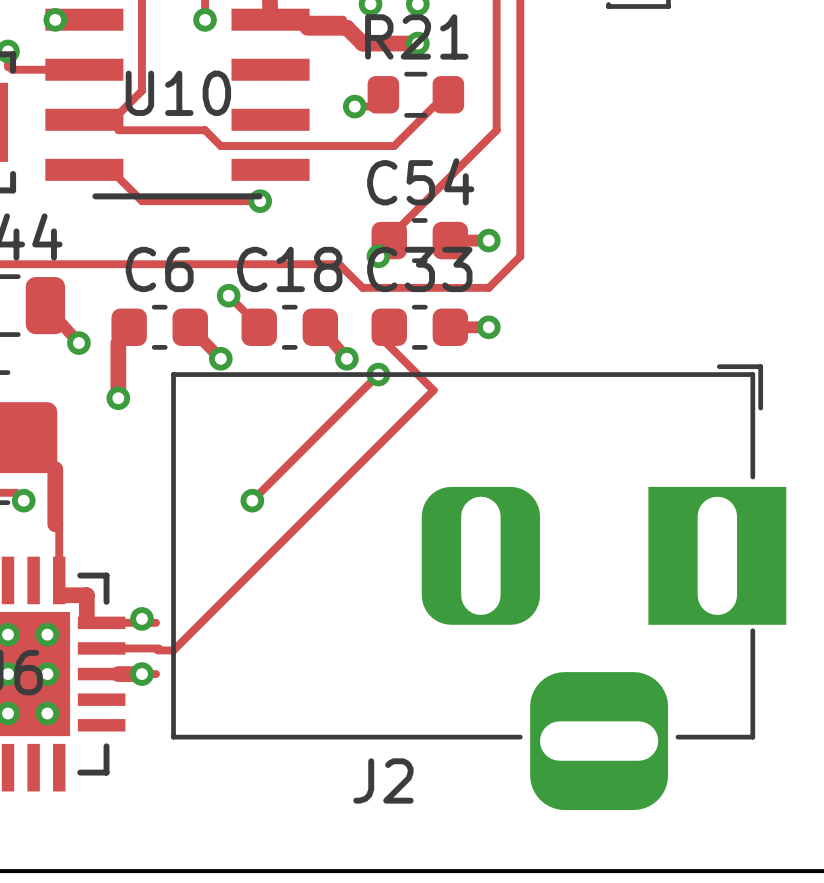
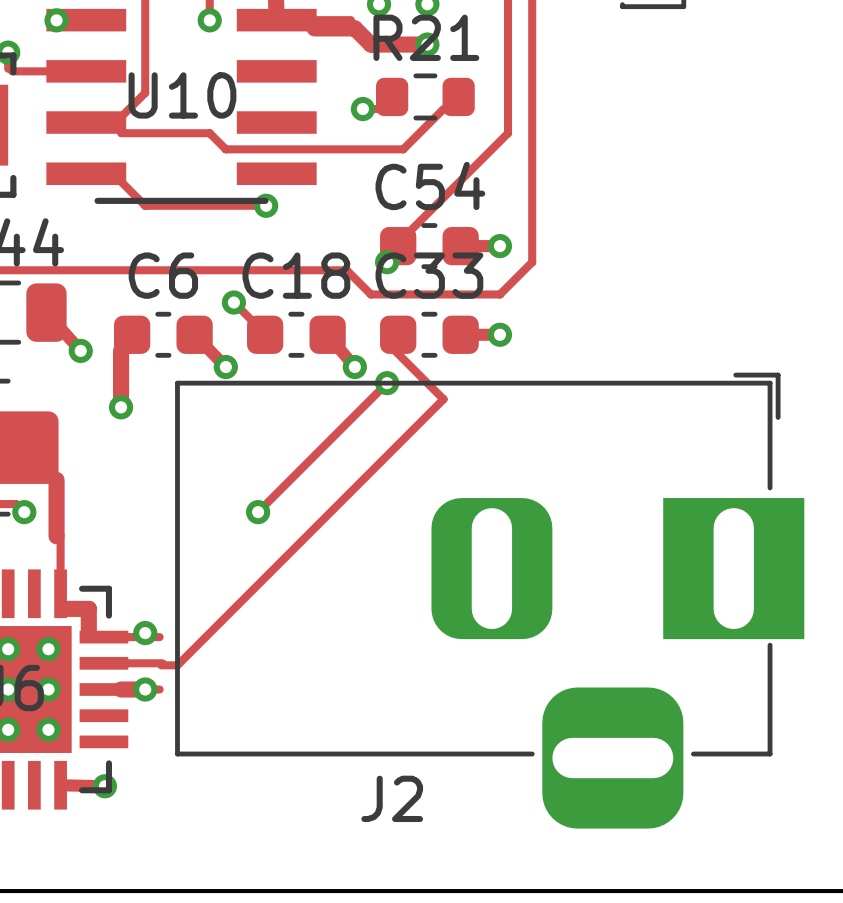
track: none -> (60, 785) (104, 786)
via: none -> (104, 786)

